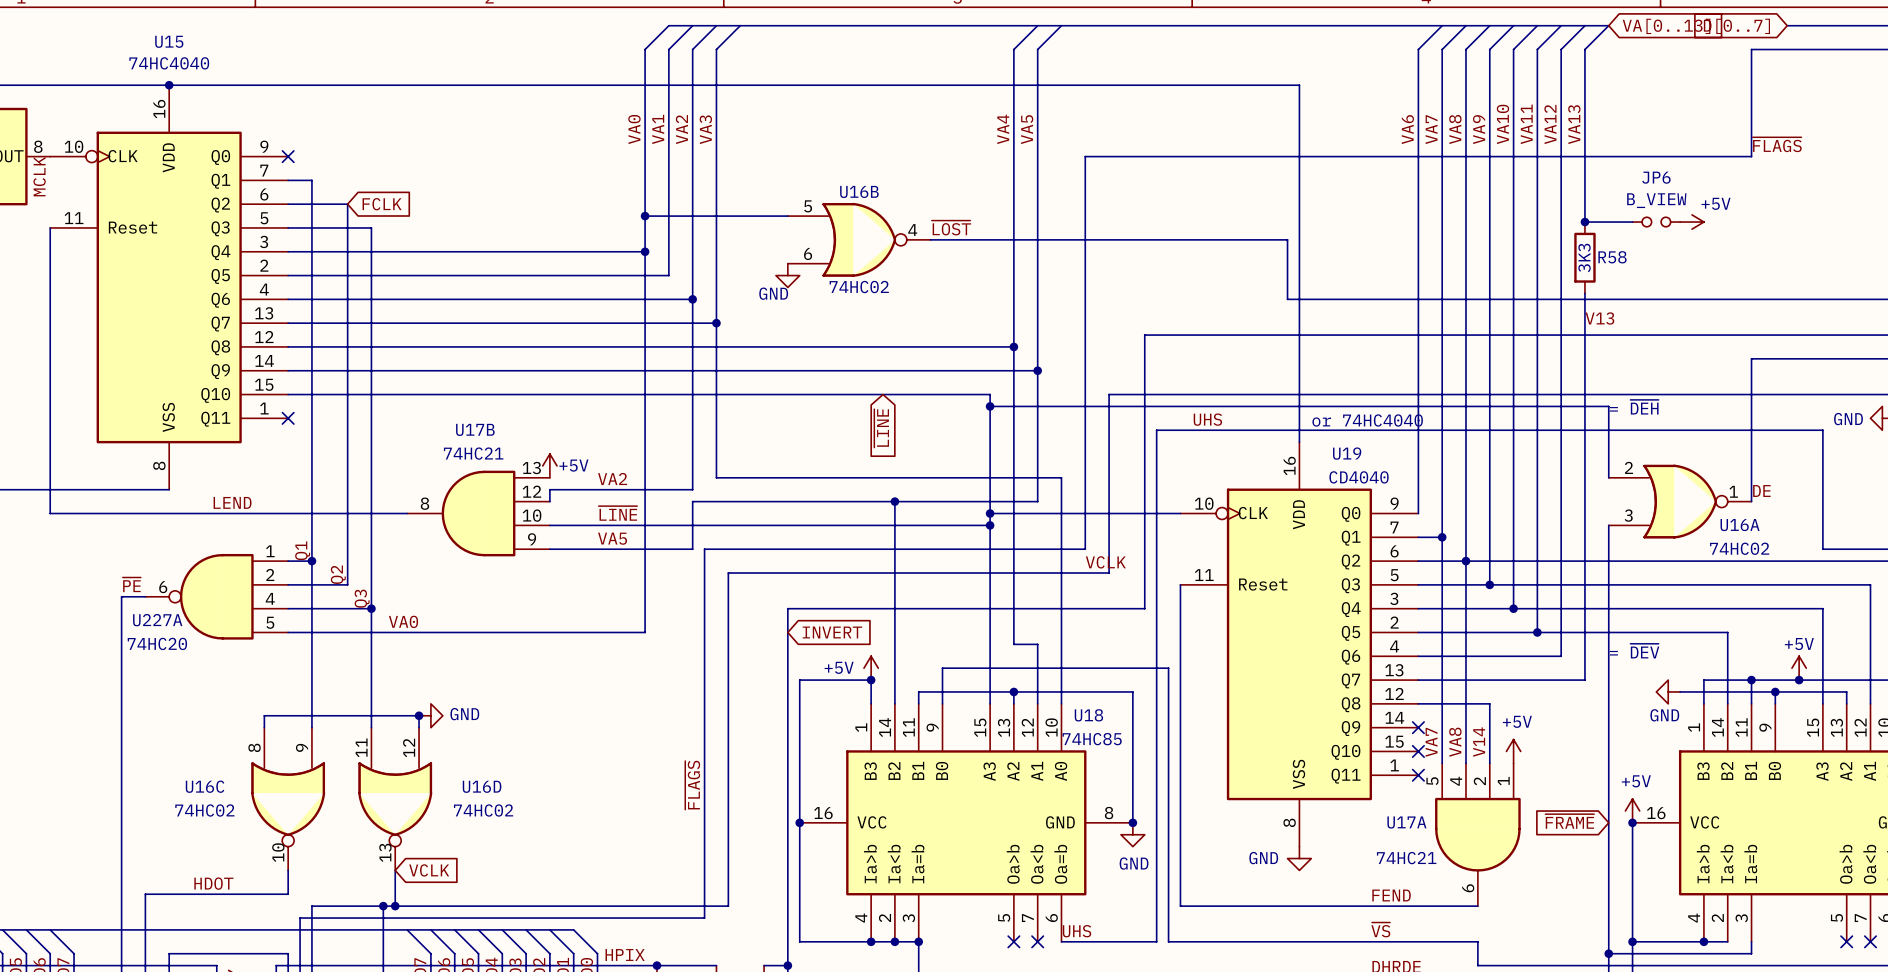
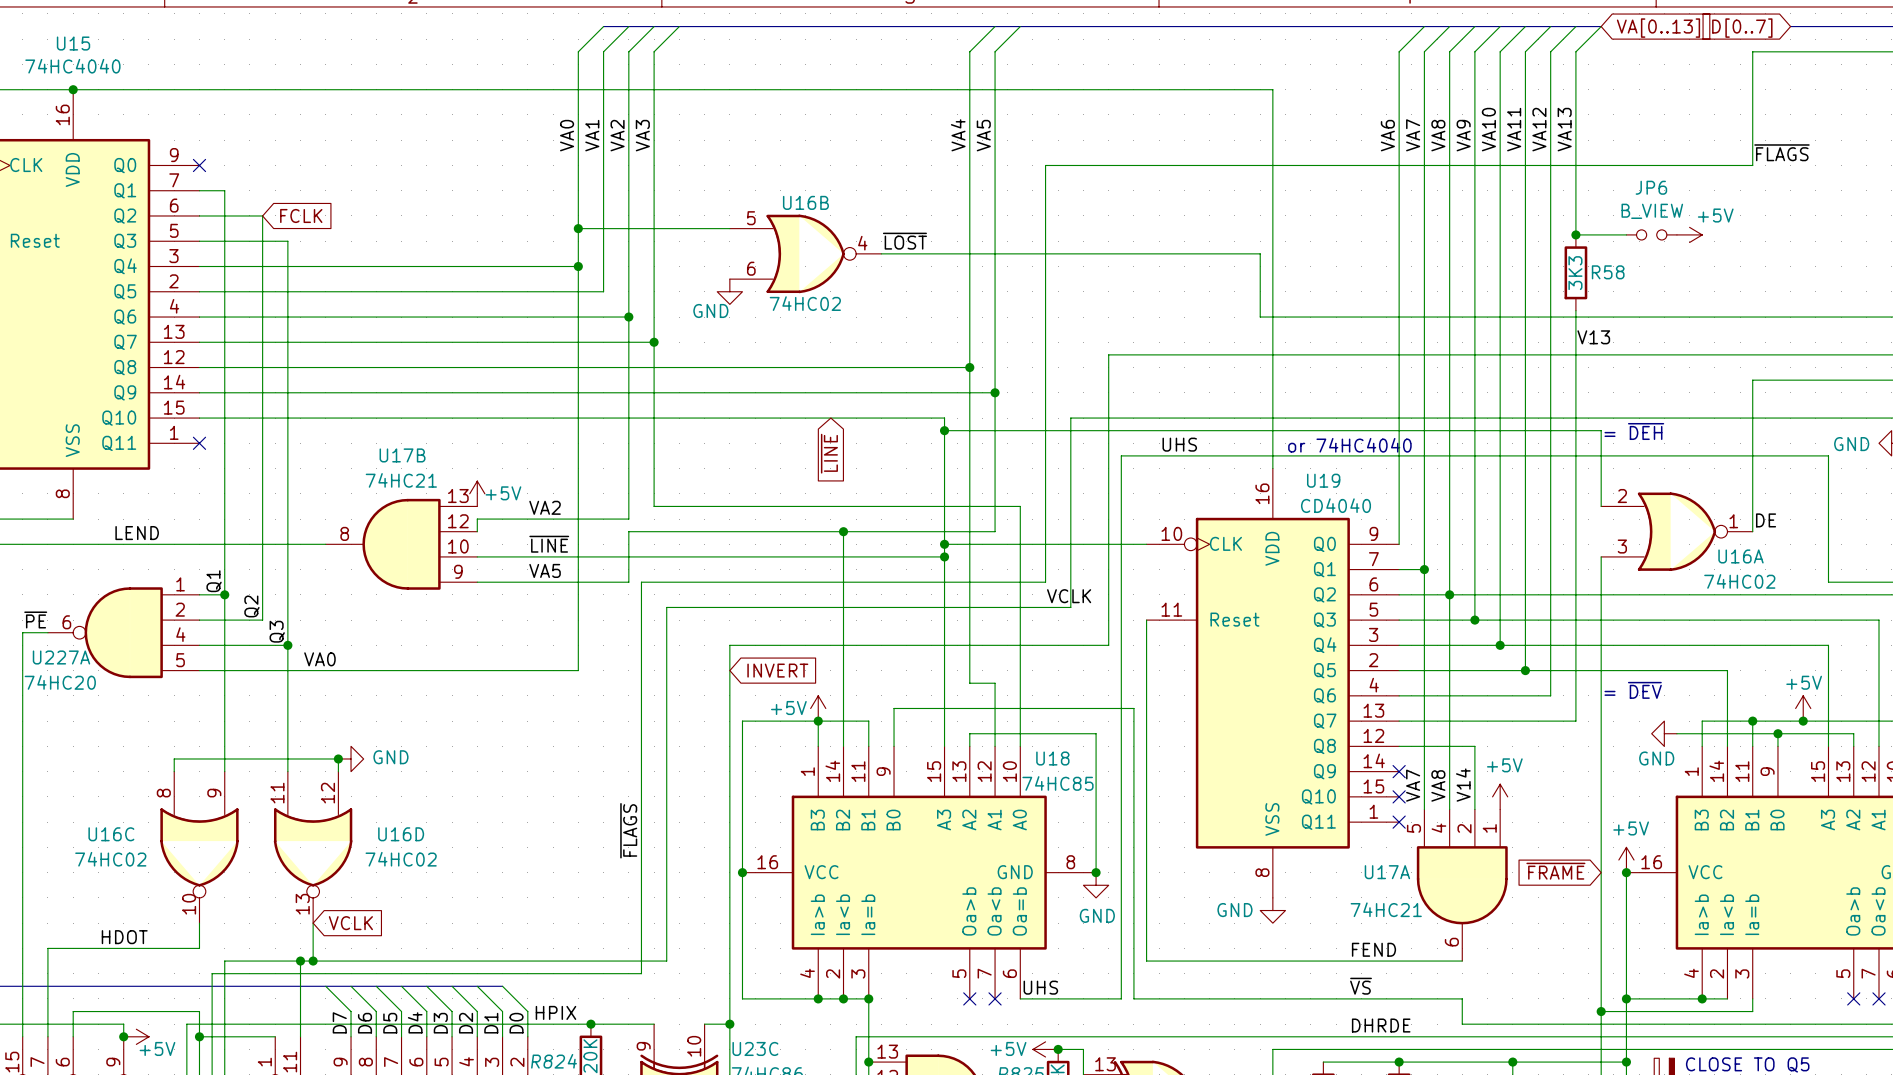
wire: (918, 691) (1013, 691) -> (868, 733) (868, 721) (818, 721)
junction: (1013, 691) -> none

